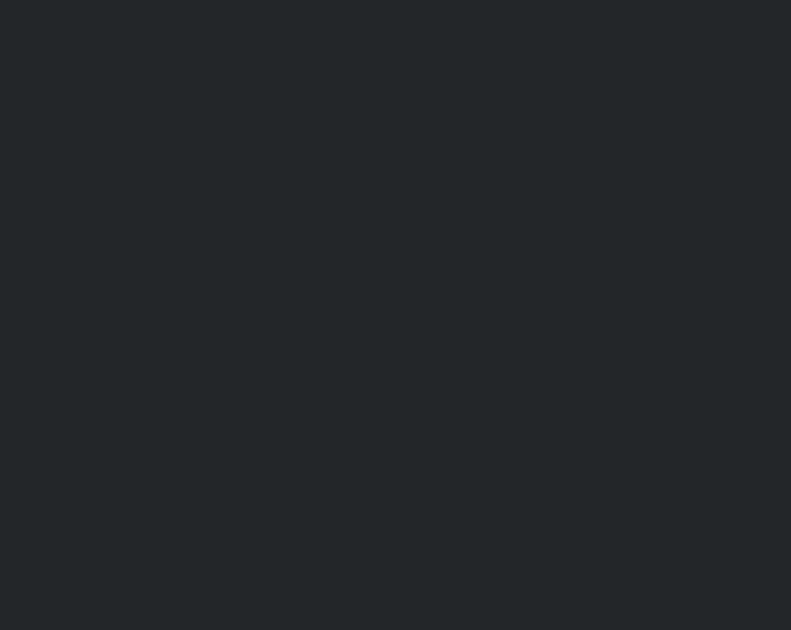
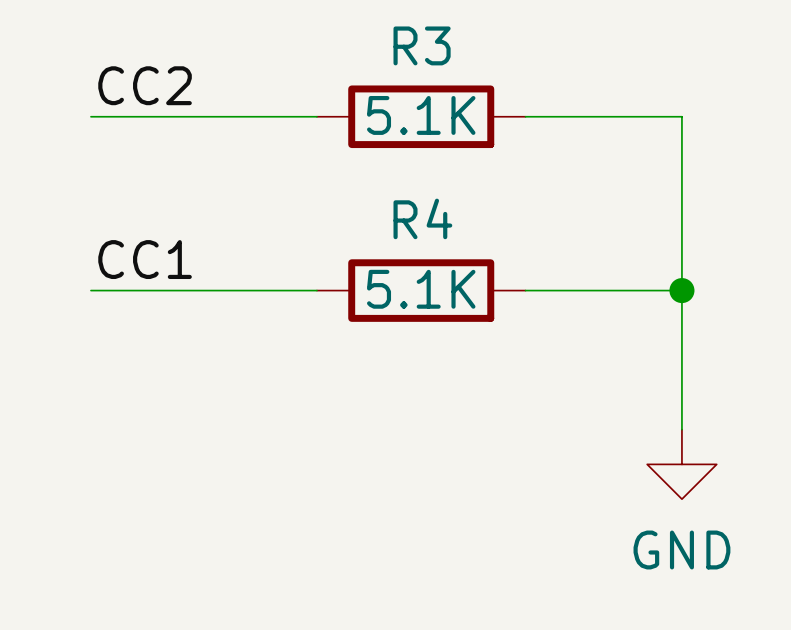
label: none -> CC2 (145, 85)
wire: none -> (90, 116) (316, 116)
R3: none -> 5.1K (421, 116)
wire: none -> (525, 116) (681, 116) (681, 429)
label: none -> CC1 (145, 259)
wire: none -> (90, 290) (316, 290)
R4: none -> 5.1K (421, 290)
wire: none -> (525, 290) (681, 290)
junction: none -> (681, 290)
power symbol: none -> GND (681, 464)

